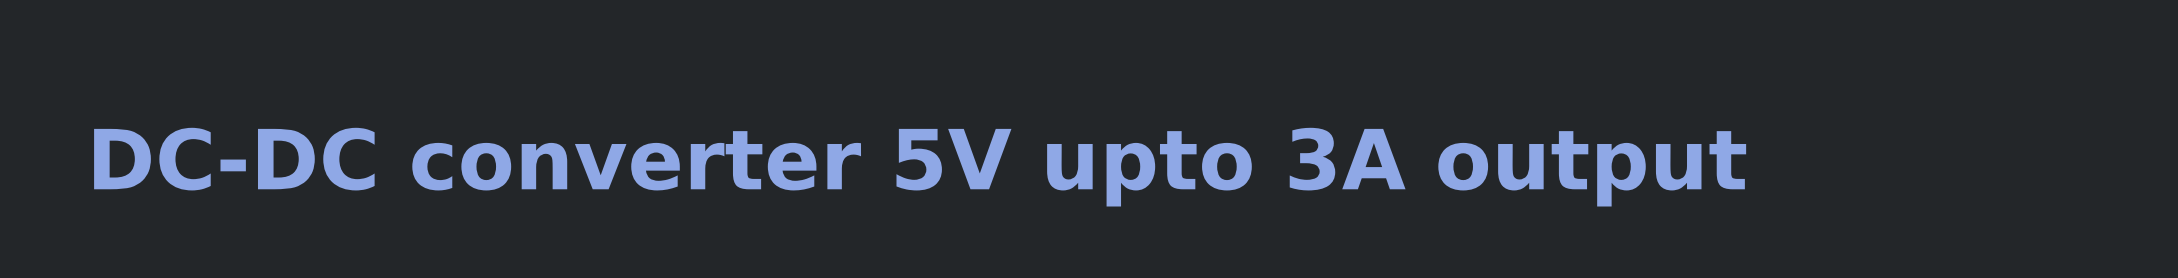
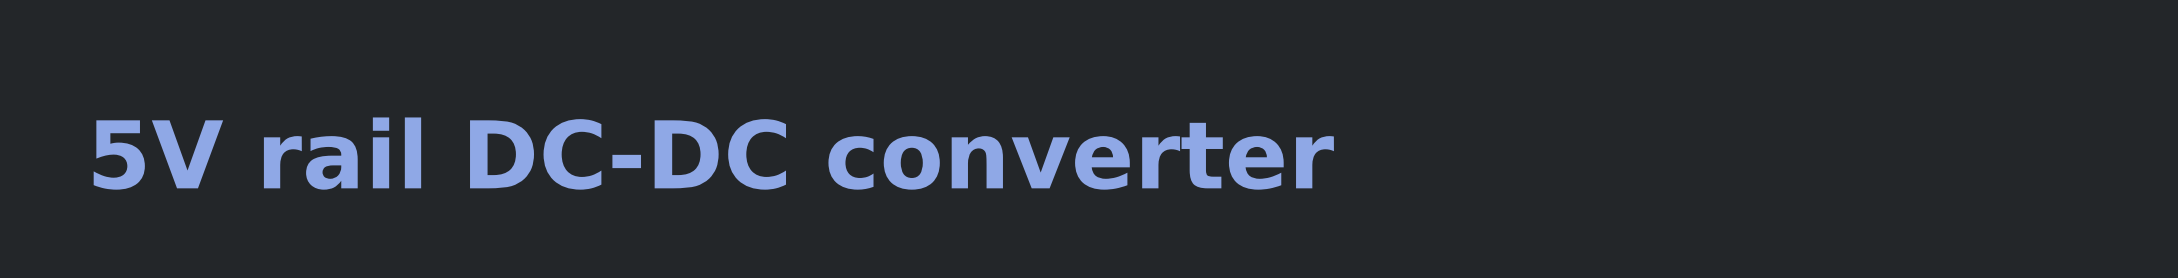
text: DC-DC converter 5V upto 3A output (920, 167) -> 5V rail DC-DC converter (713, 153)

